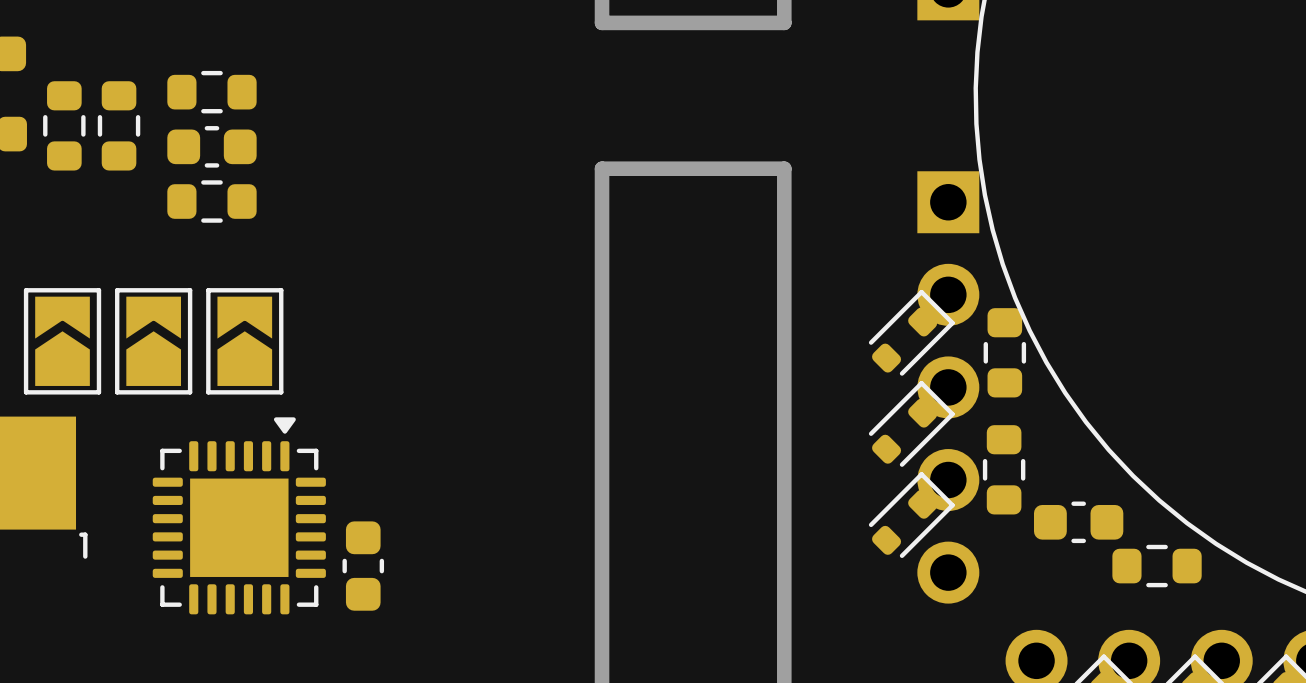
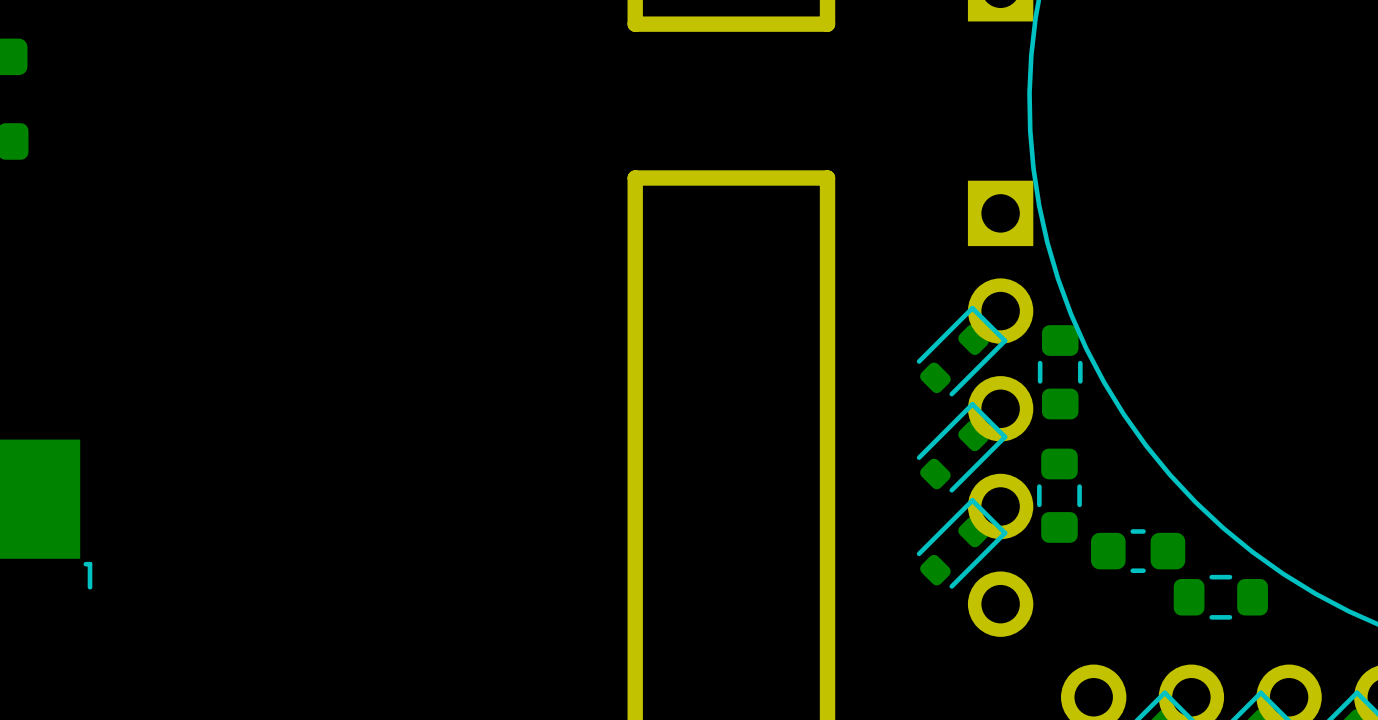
part: (211, 92) -> none
part: (64, 125) -> none
part: (119, 125) -> none
part: (211, 146) -> none
part: (211, 201) -> none
part: (62, 341) -> none
part: (153, 341) -> none
part: (244, 341) -> none
part: (239, 515) -> none
part: (363, 566) -> none

